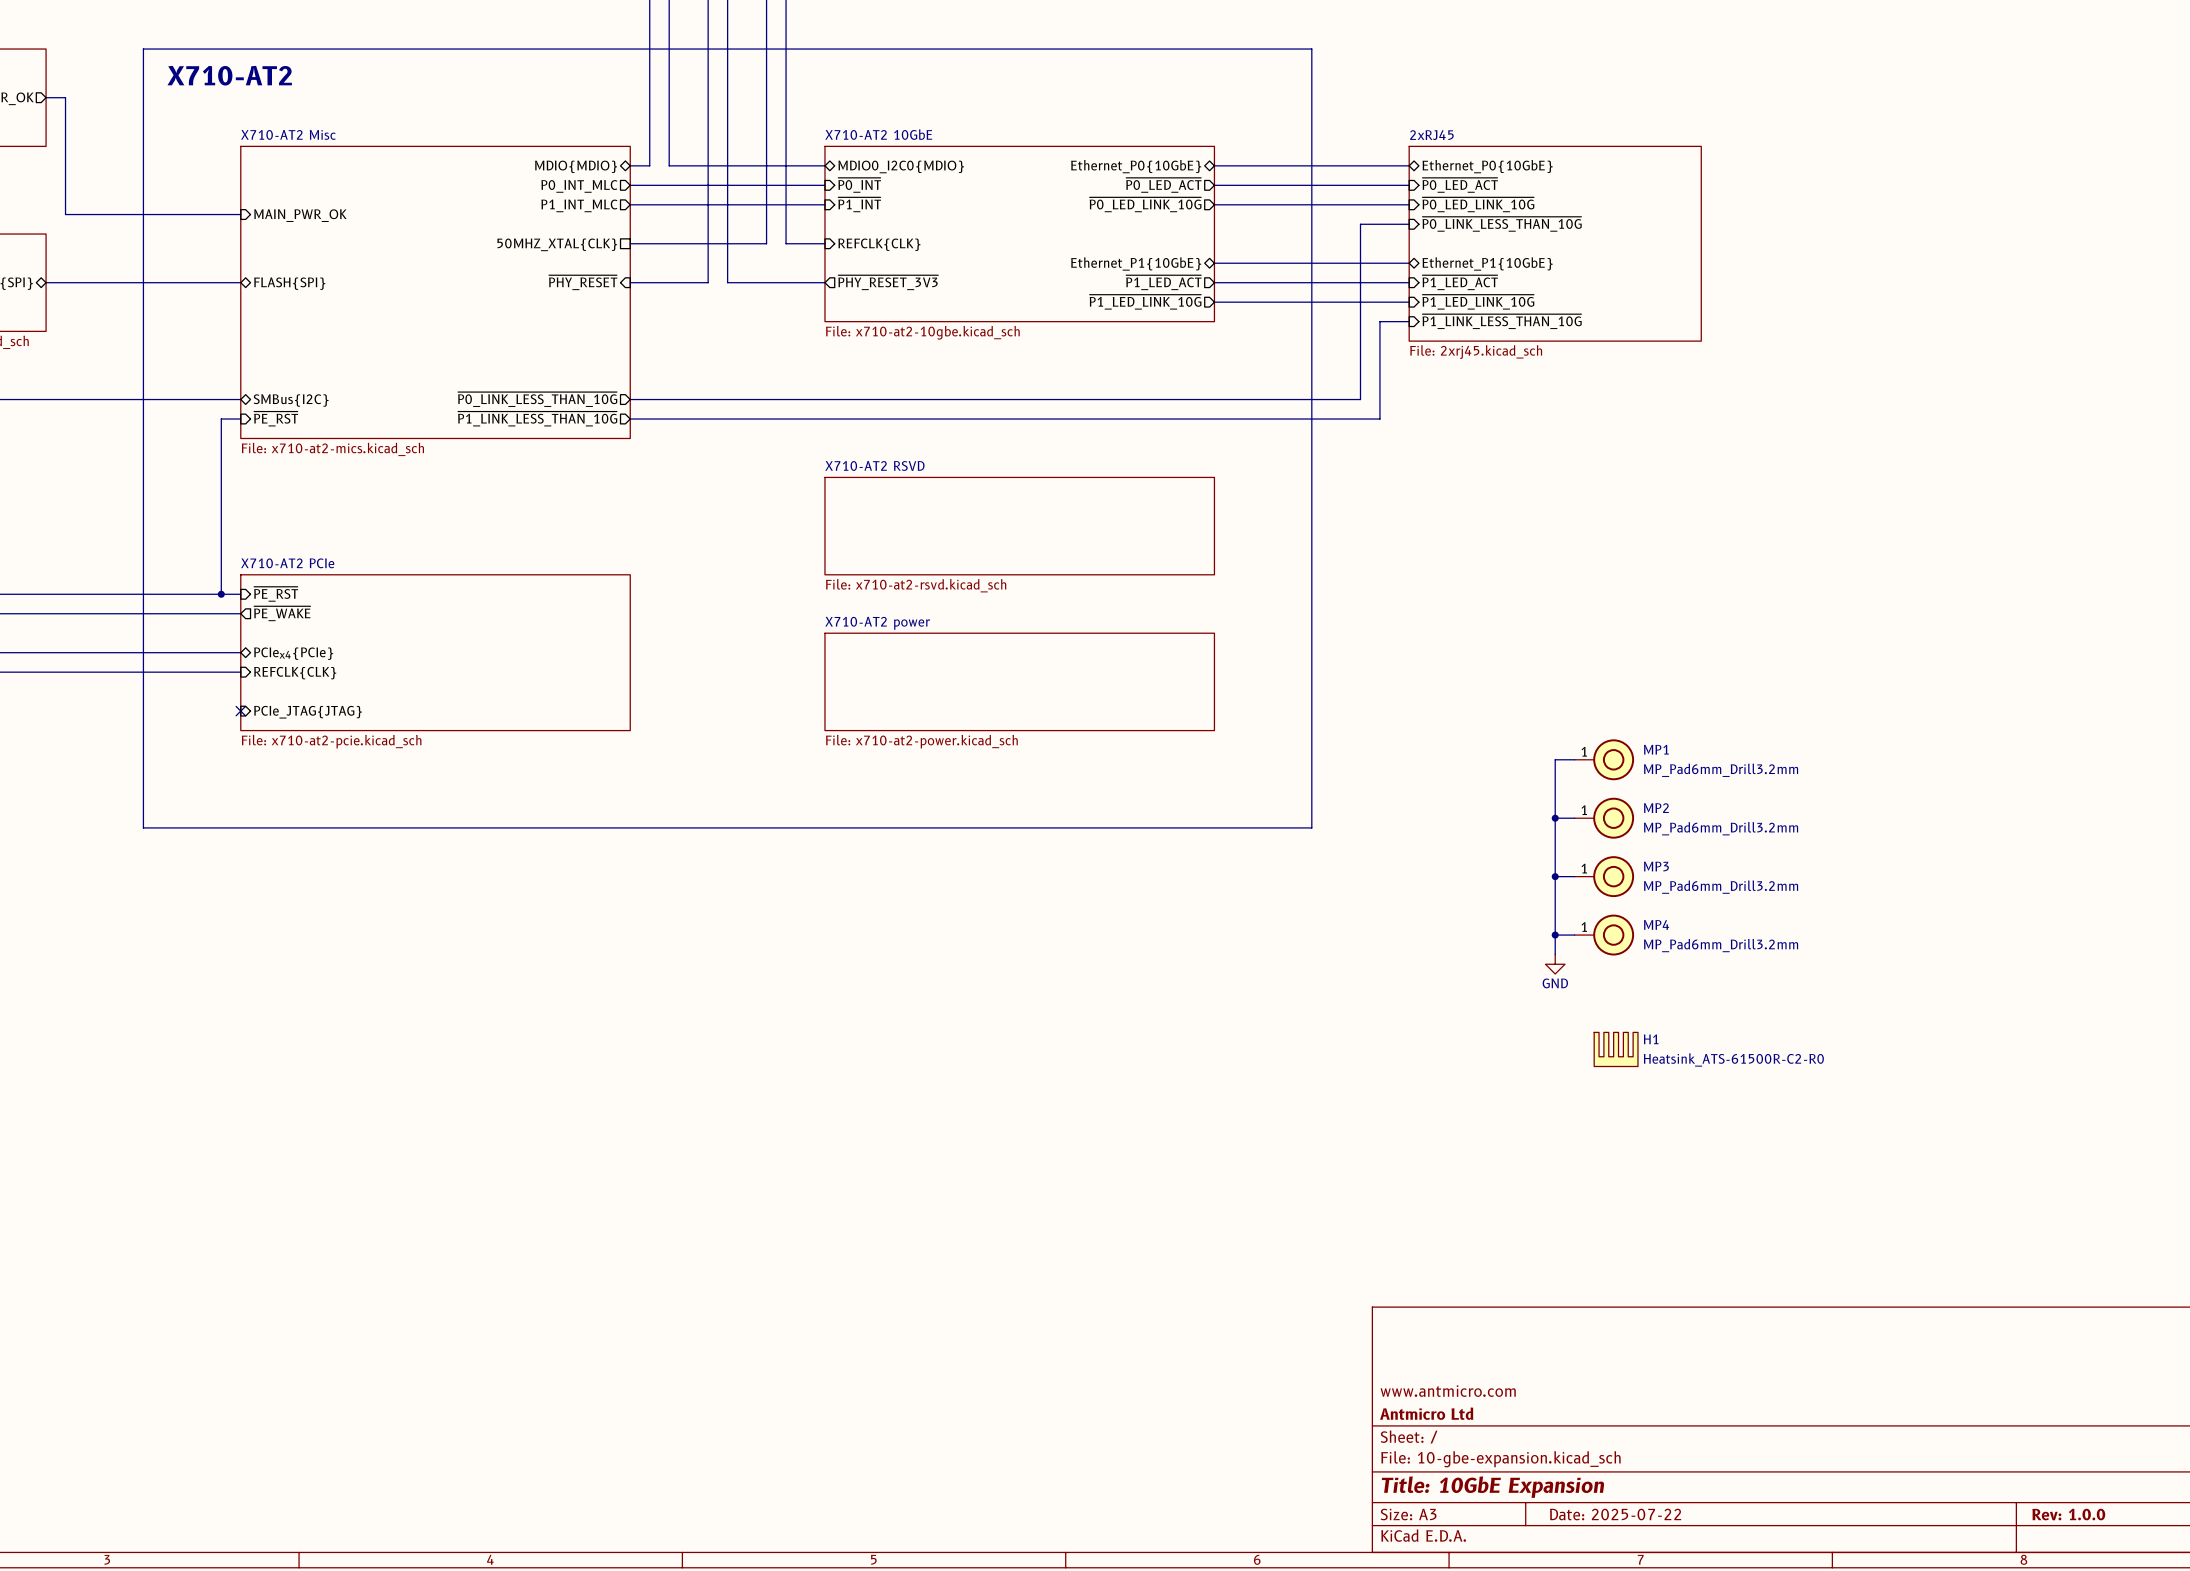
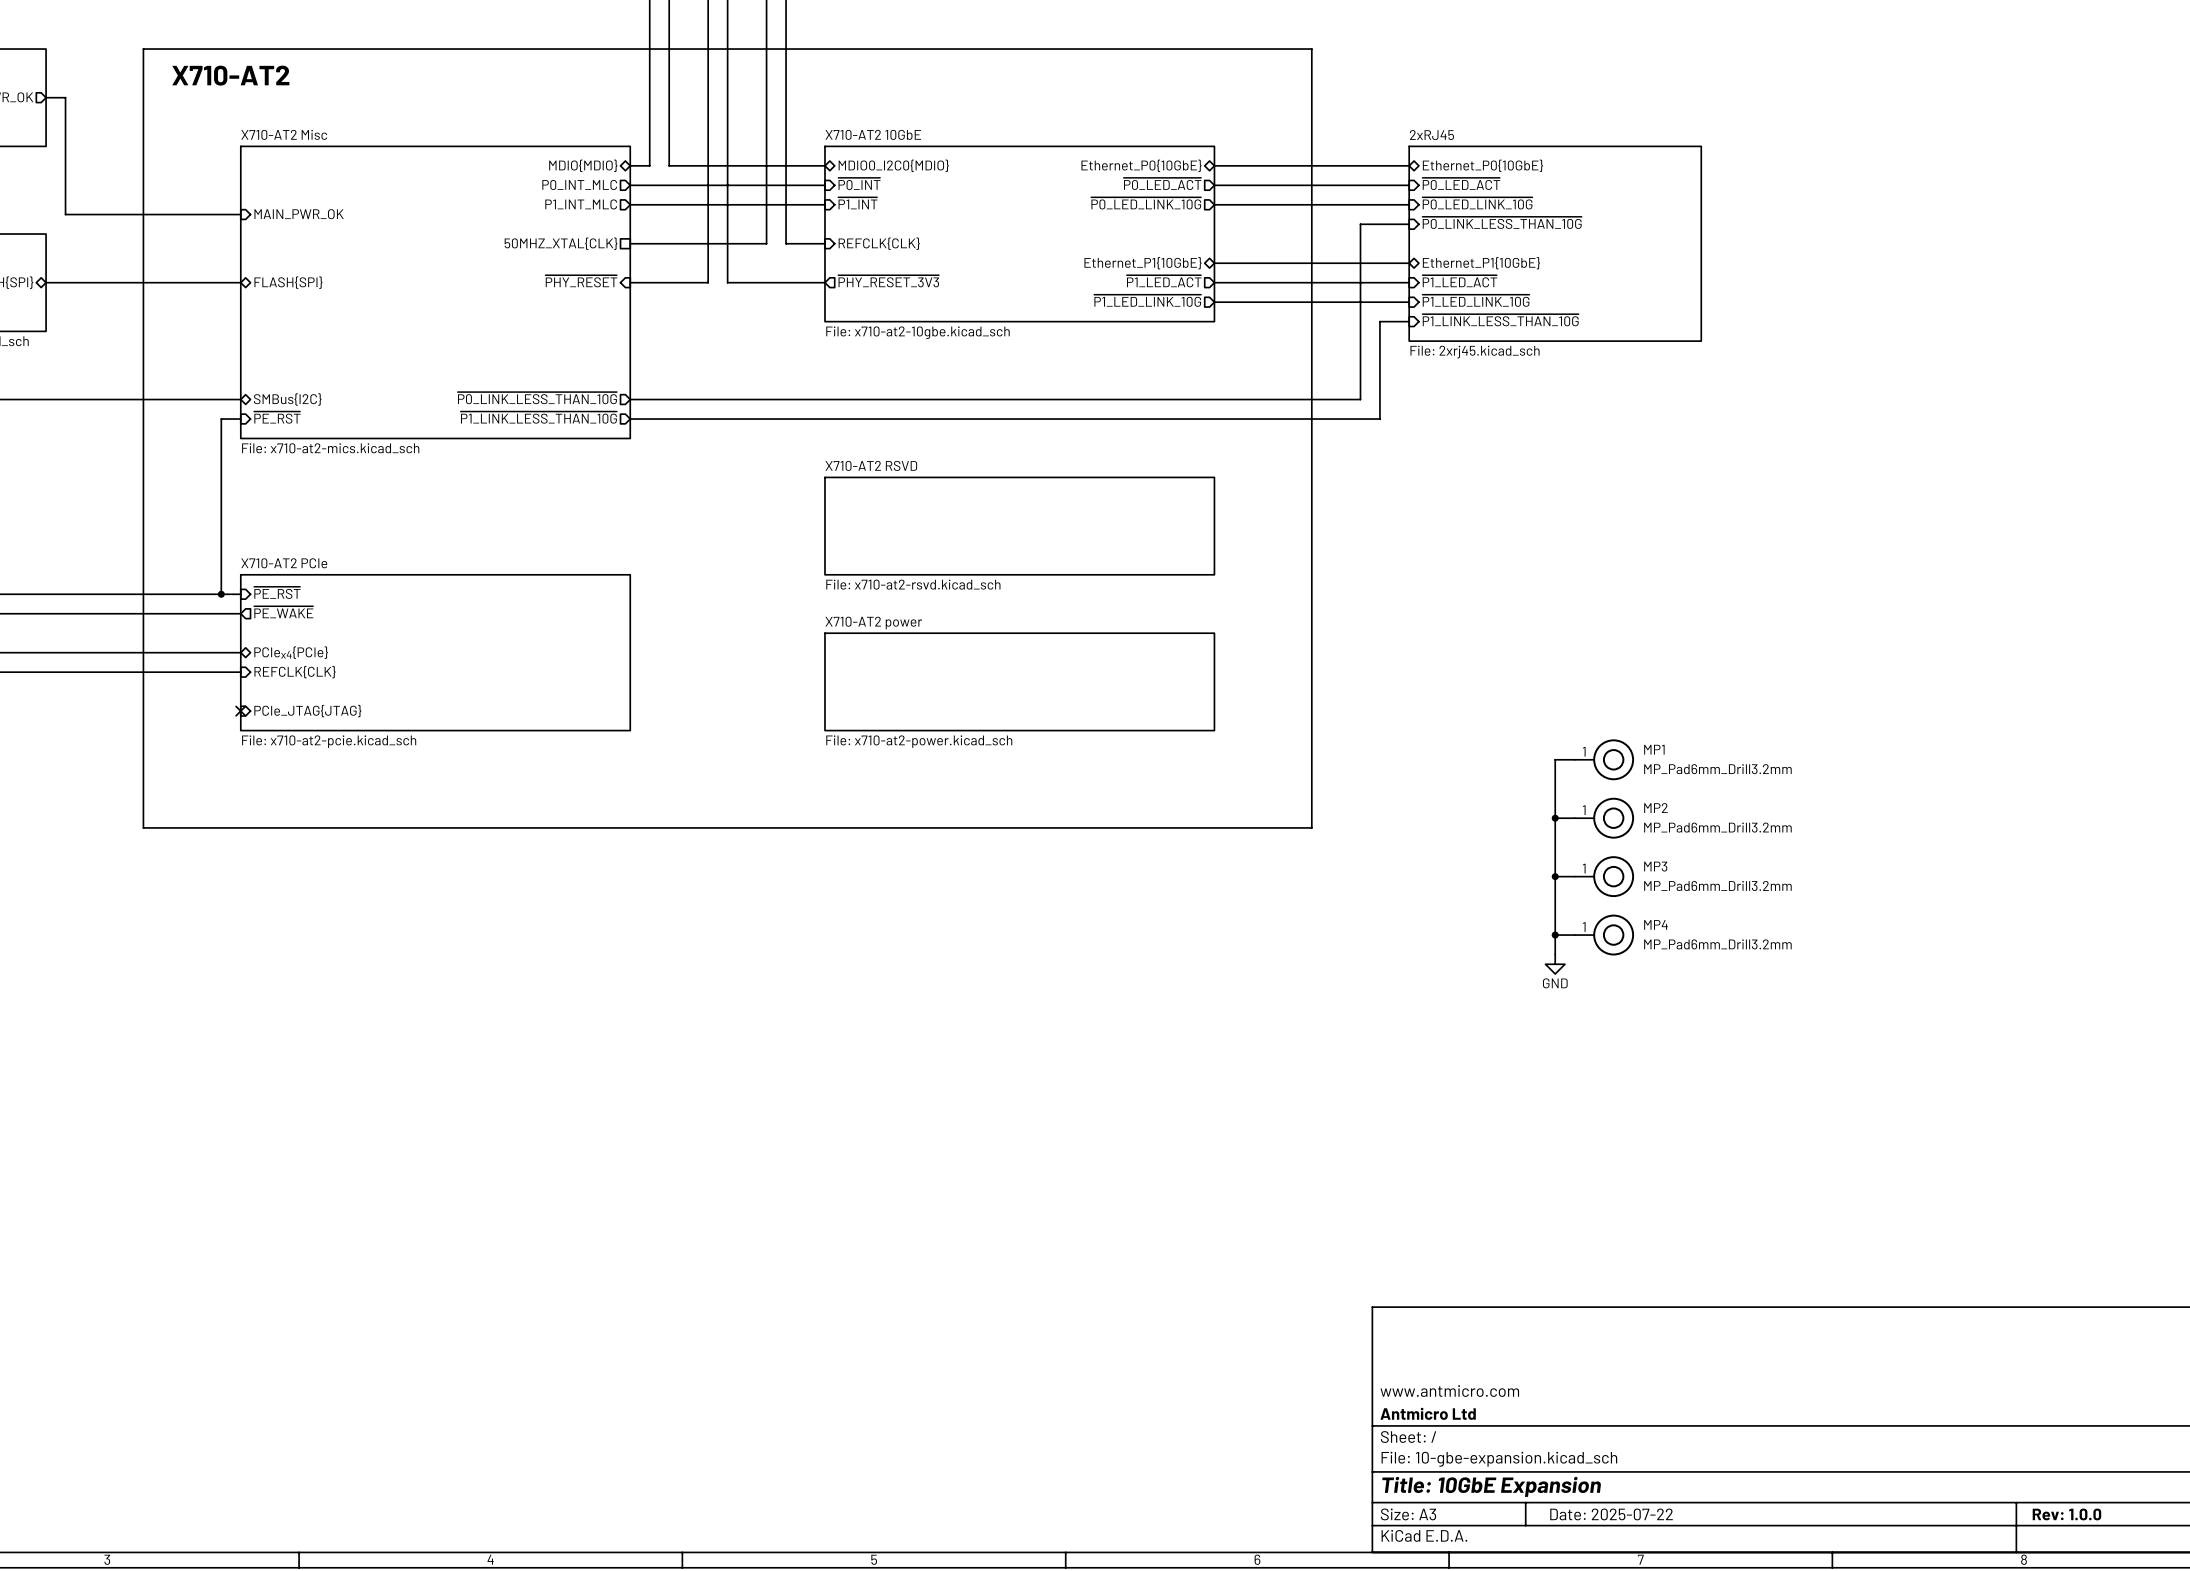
H1: Heatsink_ATS-61500R-C2-R0 (1616, 1049) -> none

